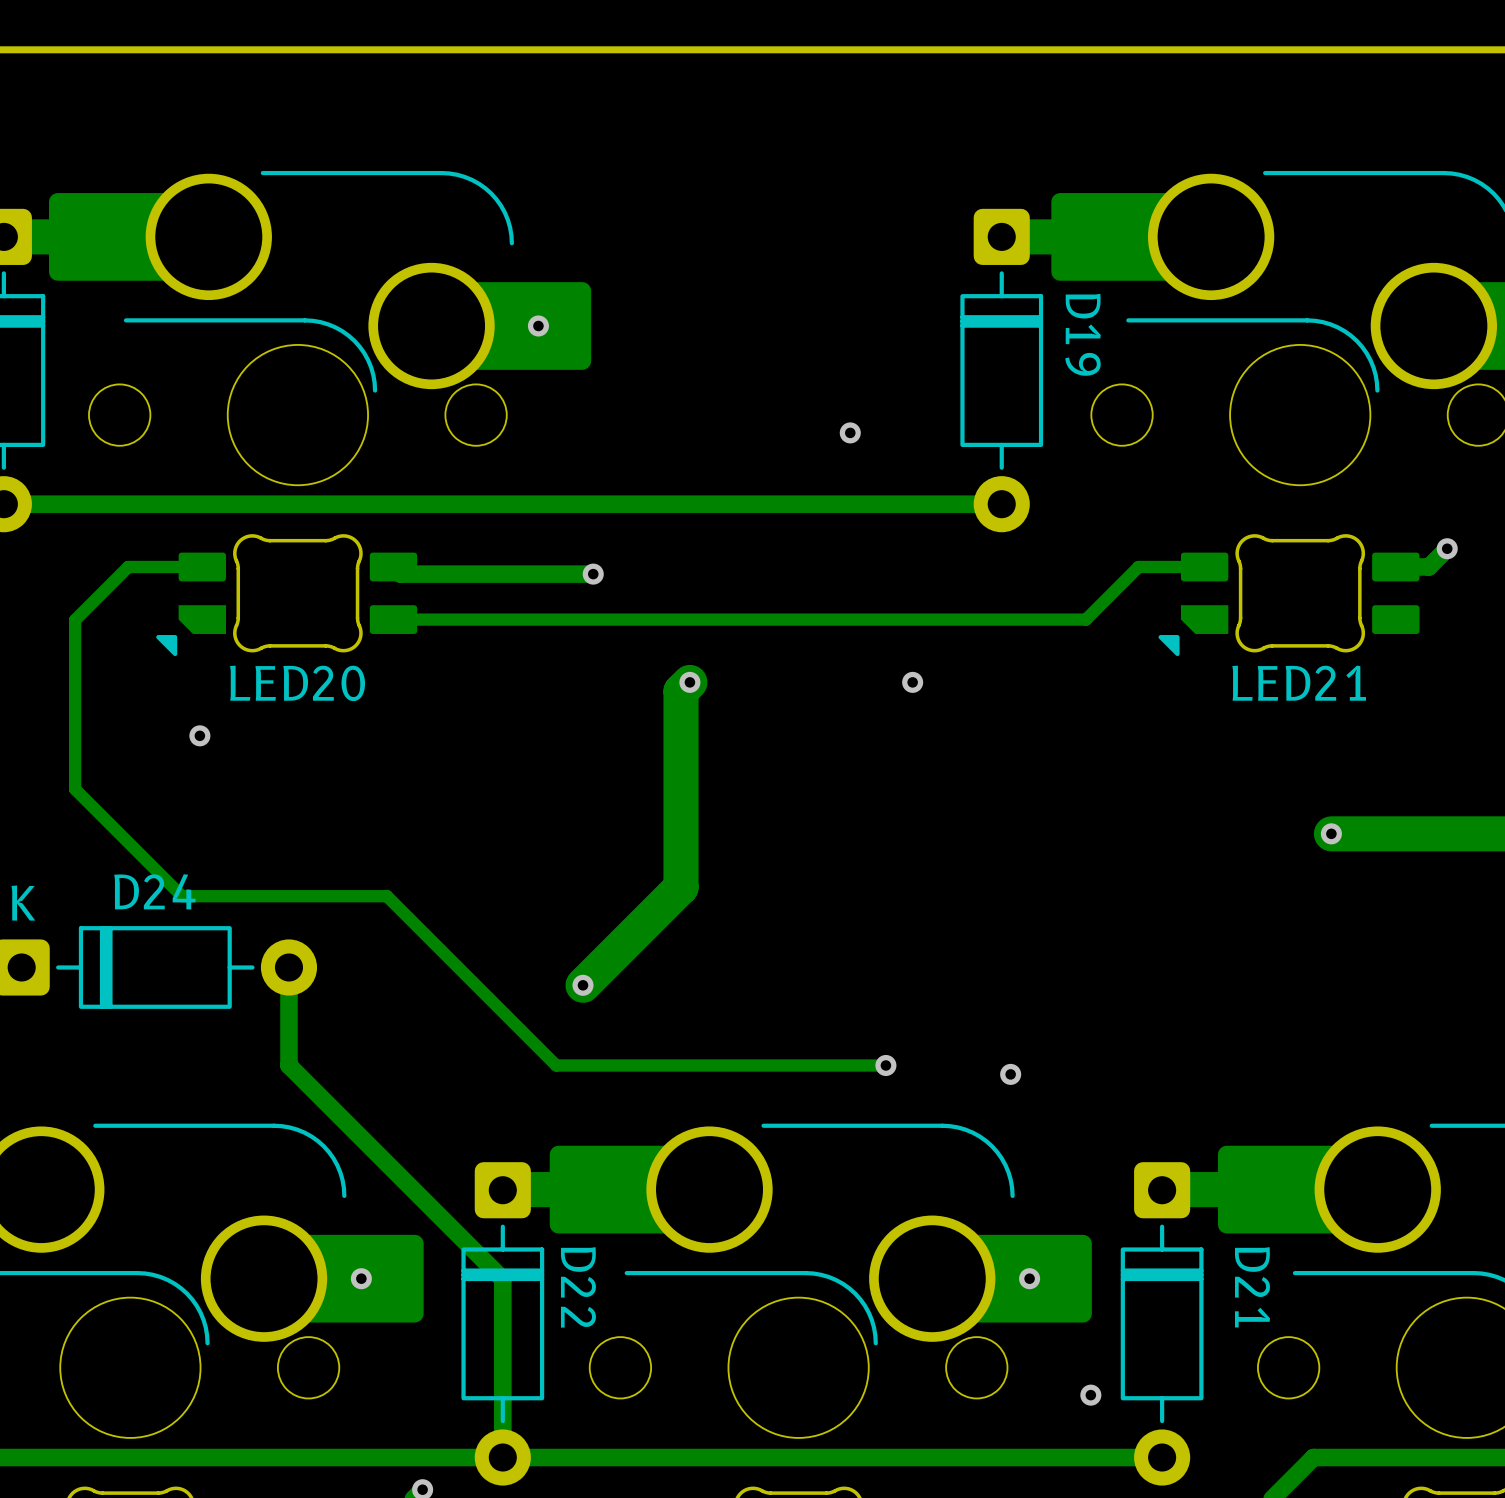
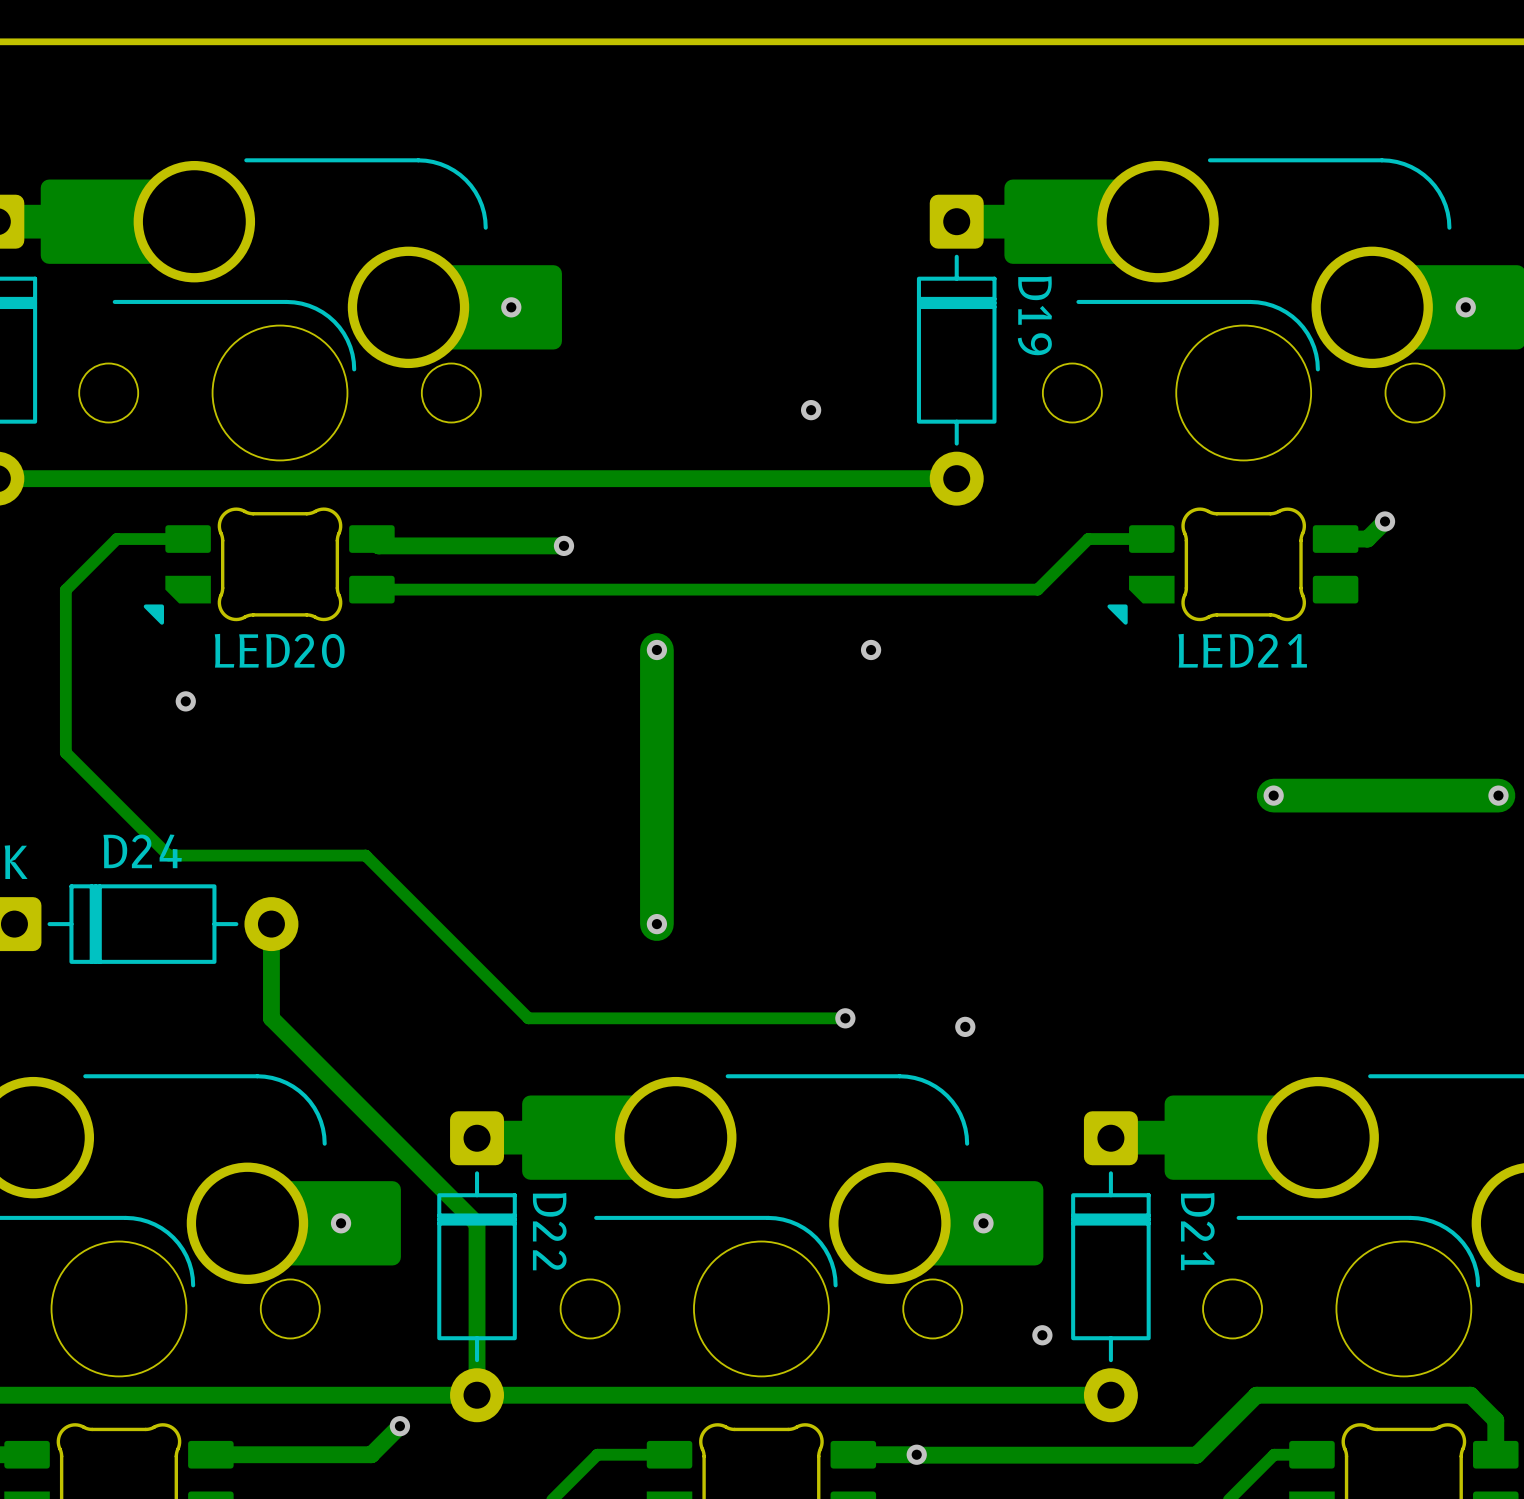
track: (689, 682) (681, 691) (681, 887) (582, 985) -> (656, 649) (656, 924)
via position: (582, 985) -> (656, 924)

